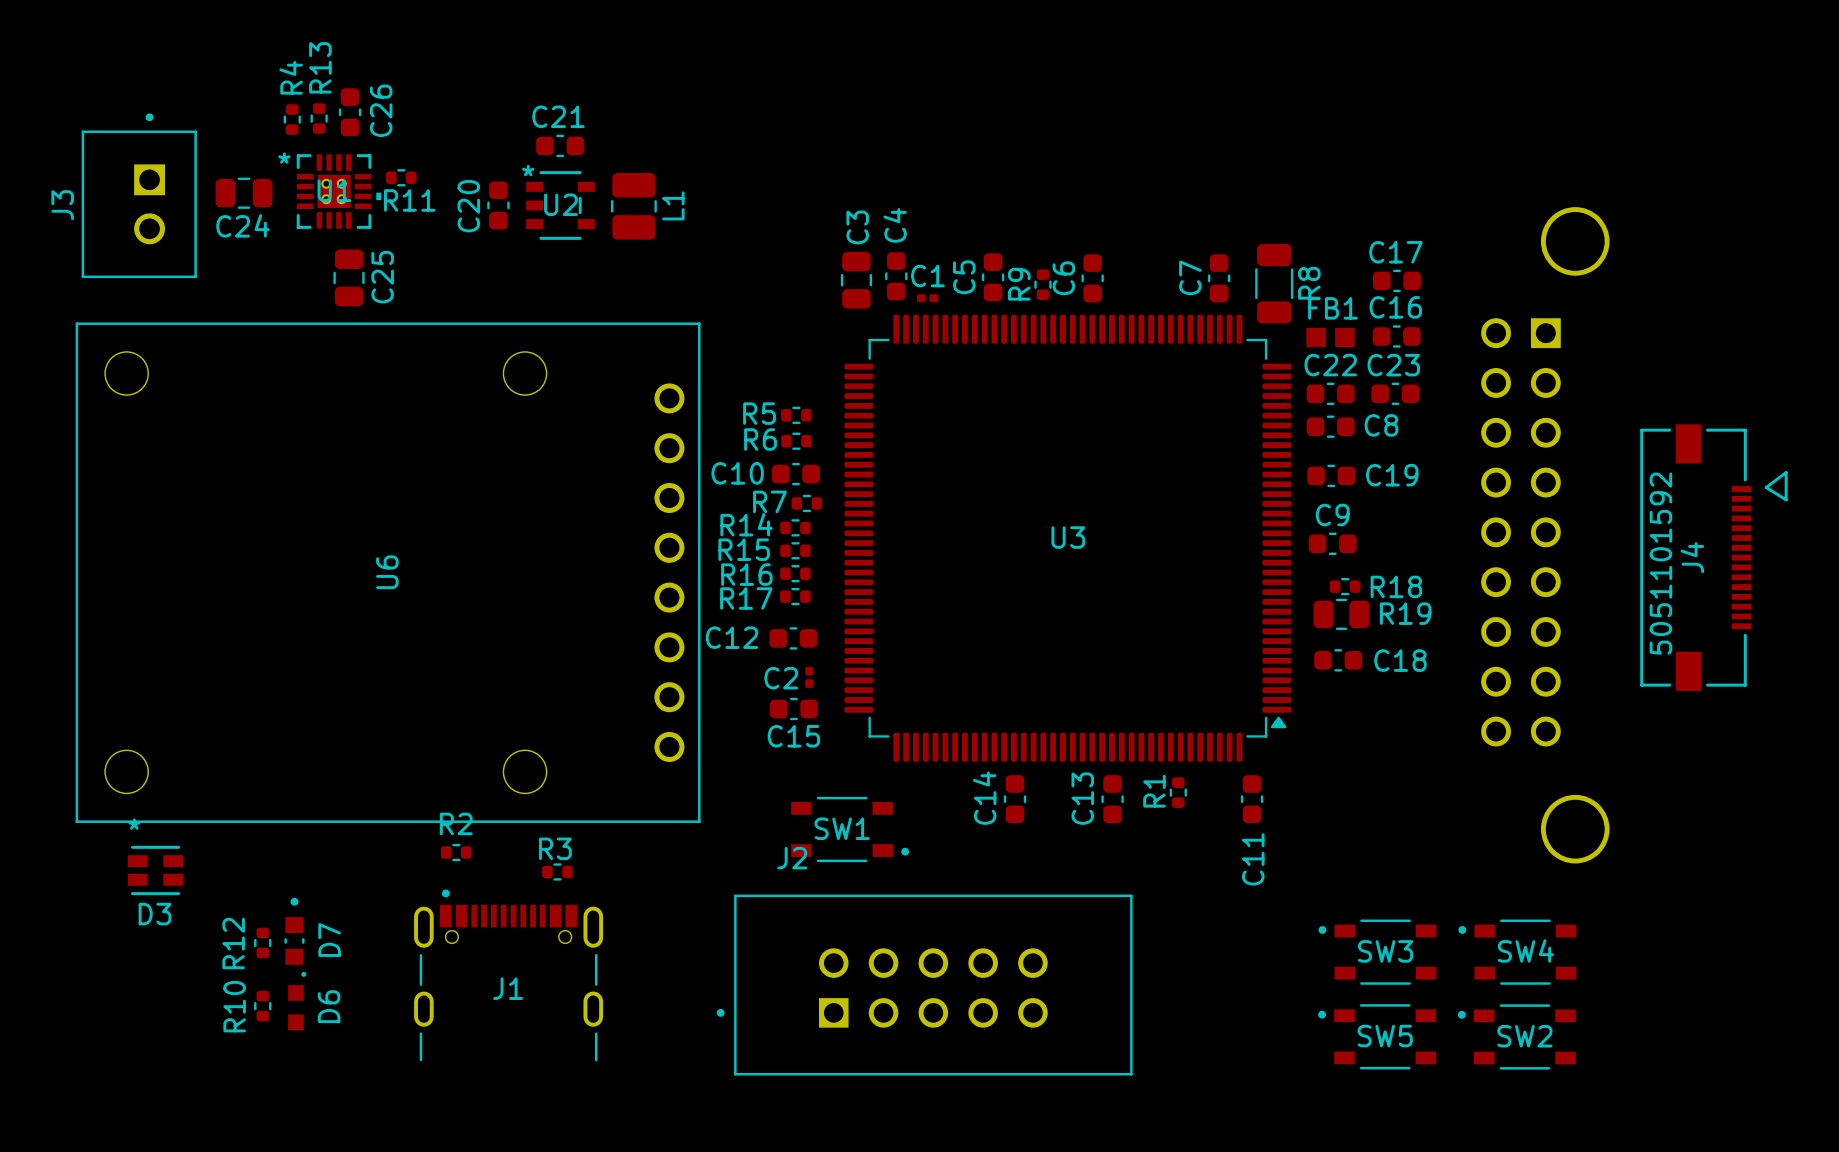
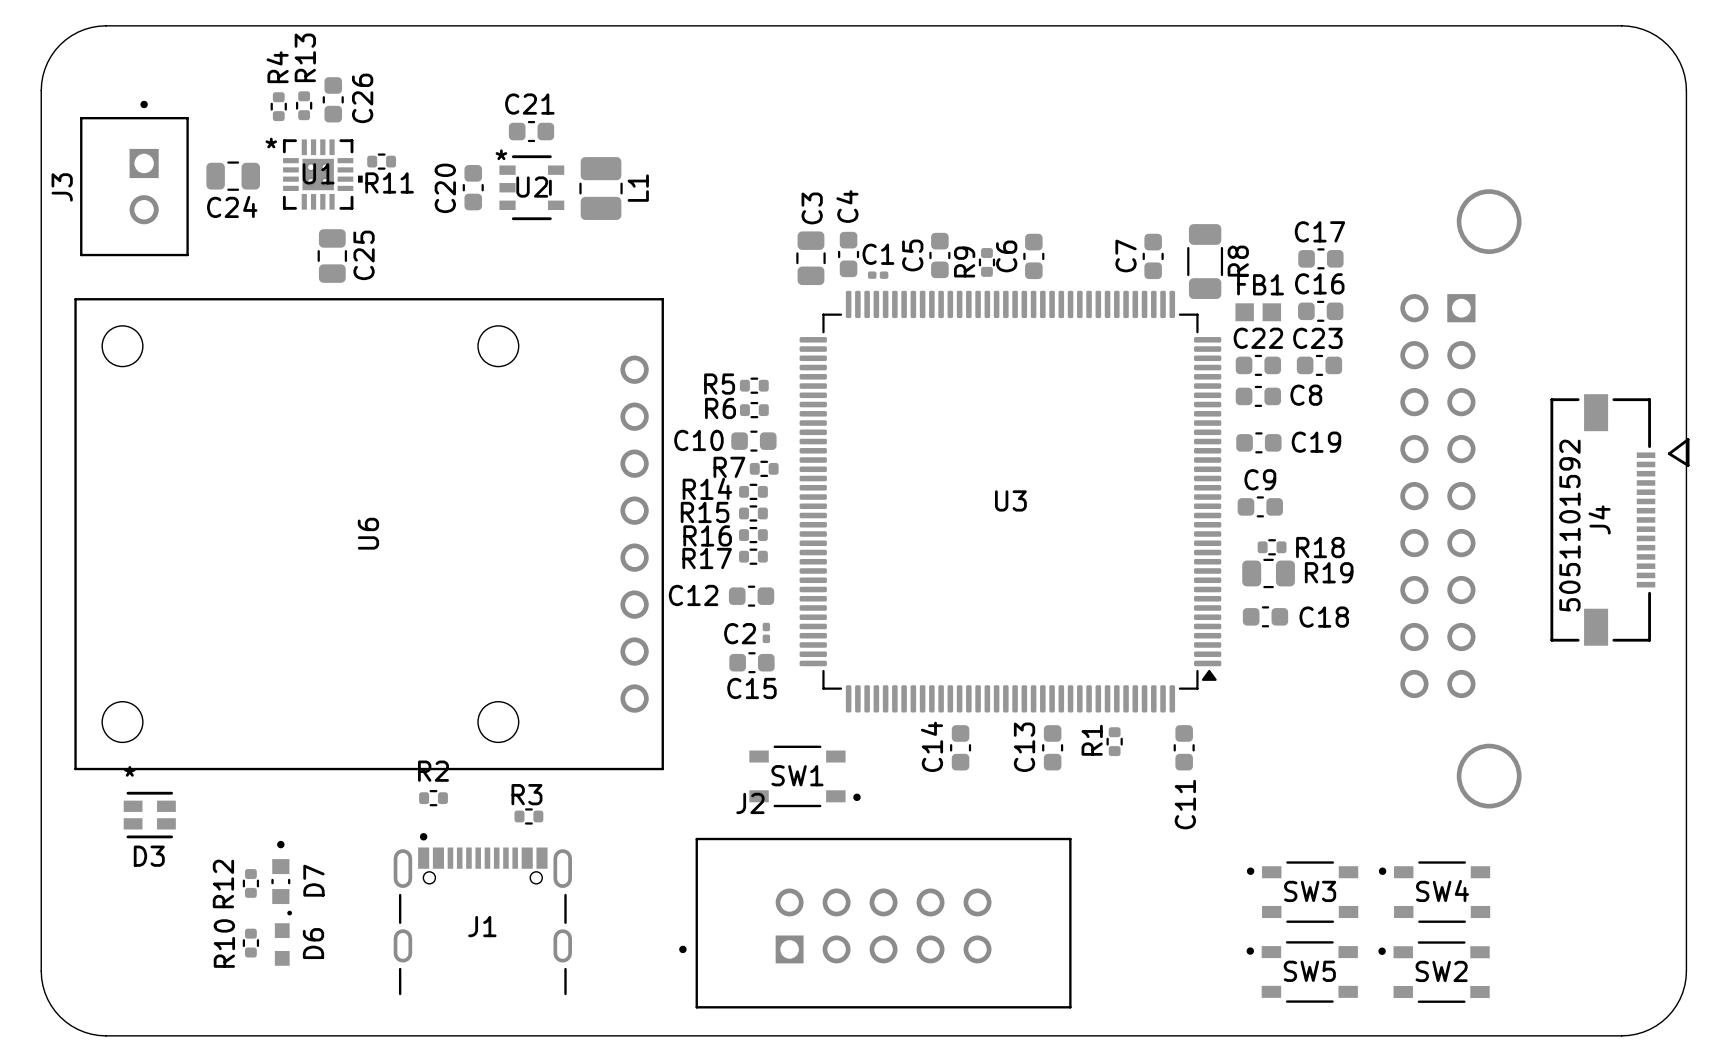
board edge: none -> (105, 25) (1621, 25) (1643, 29) (1656, 35) (1667, 44) (1676, 56) (1682, 69) (1686, 90) (1686, 971) (1682, 992) (1676, 1005) (1667, 1016) (1649, 1029) (1636, 1034) (1621, 1035) (105, 1035) (91, 1034) (71, 1025) (60, 1016) (47, 999) (42, 985) (41, 971) (41, 90) (42, 76) (47, 62) (60, 44) (77, 32) (91, 27) (105, 25)

